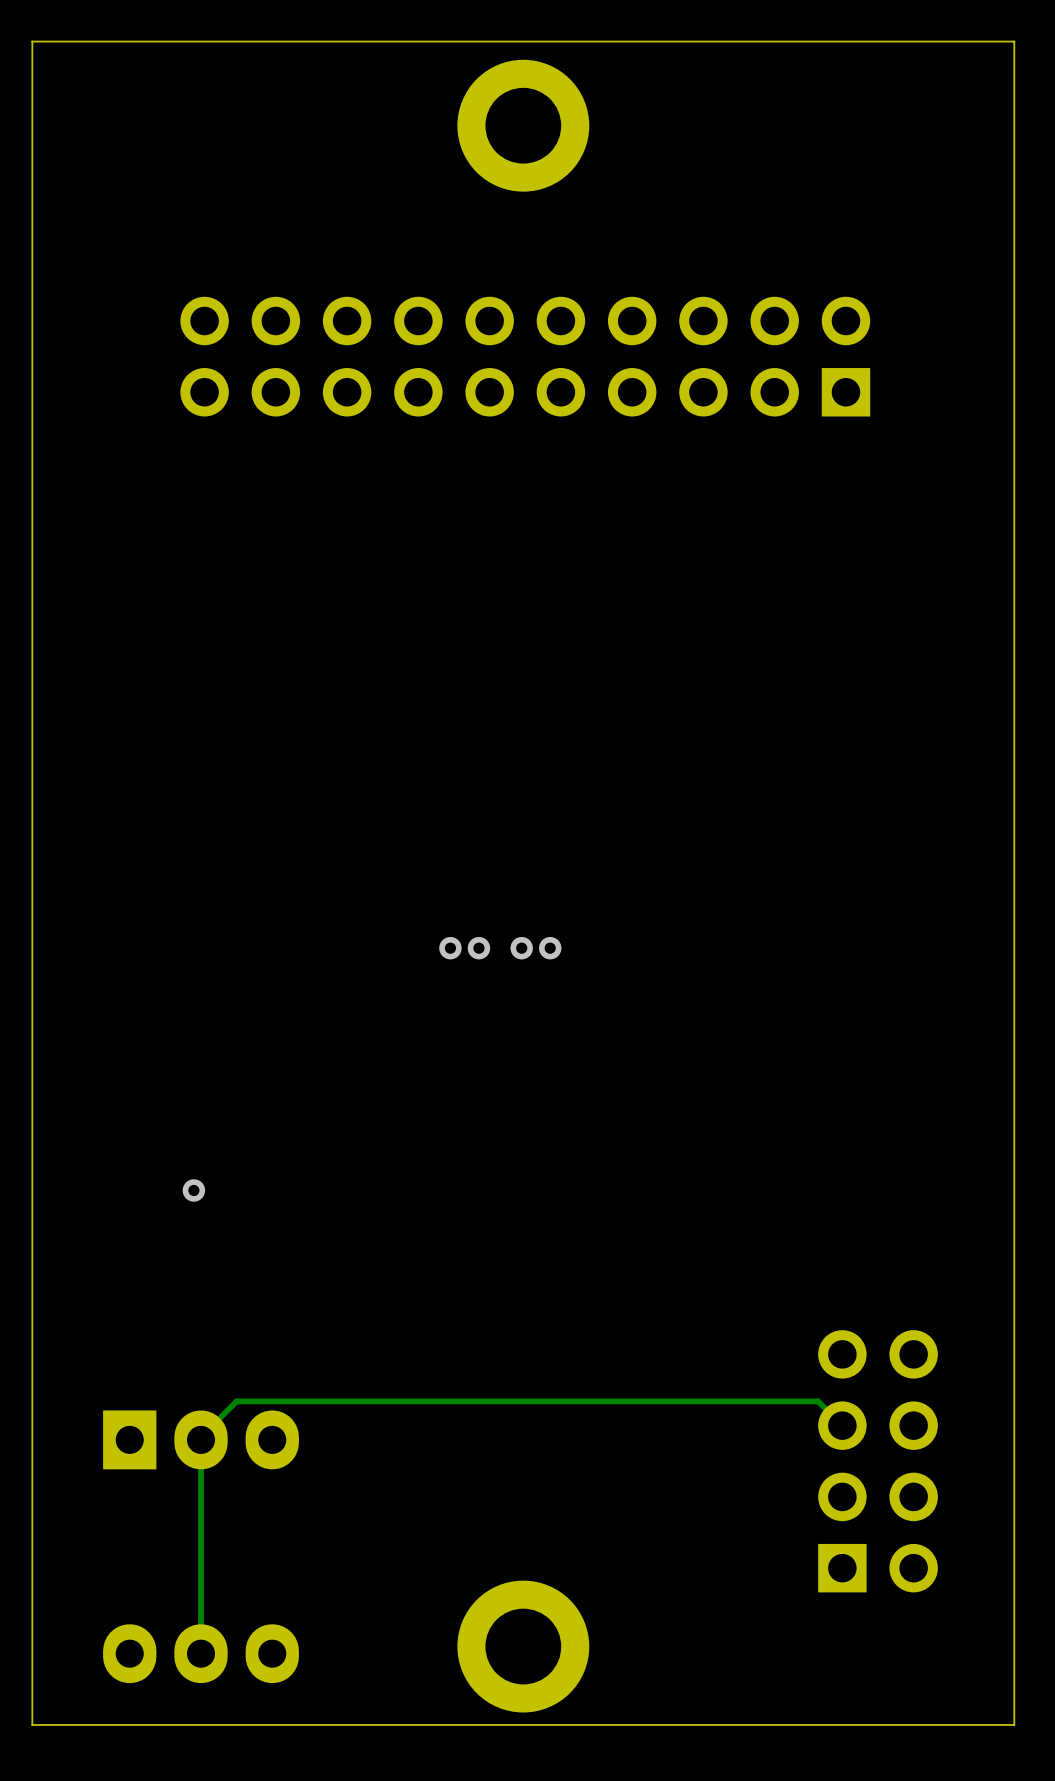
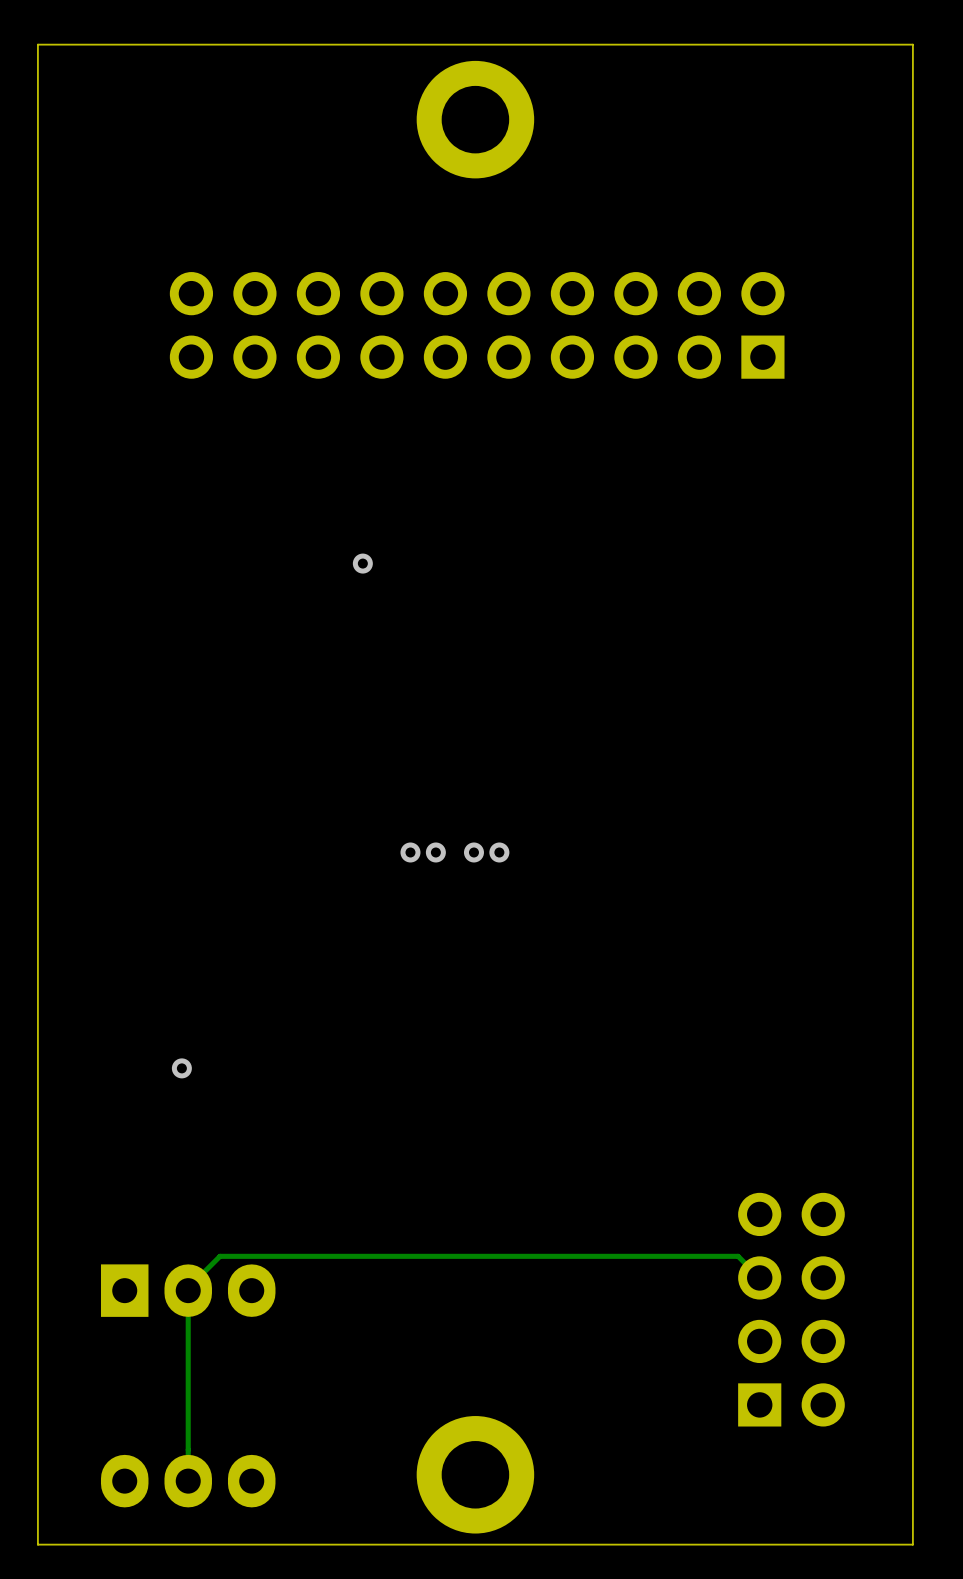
via: none -> (362, 563)

